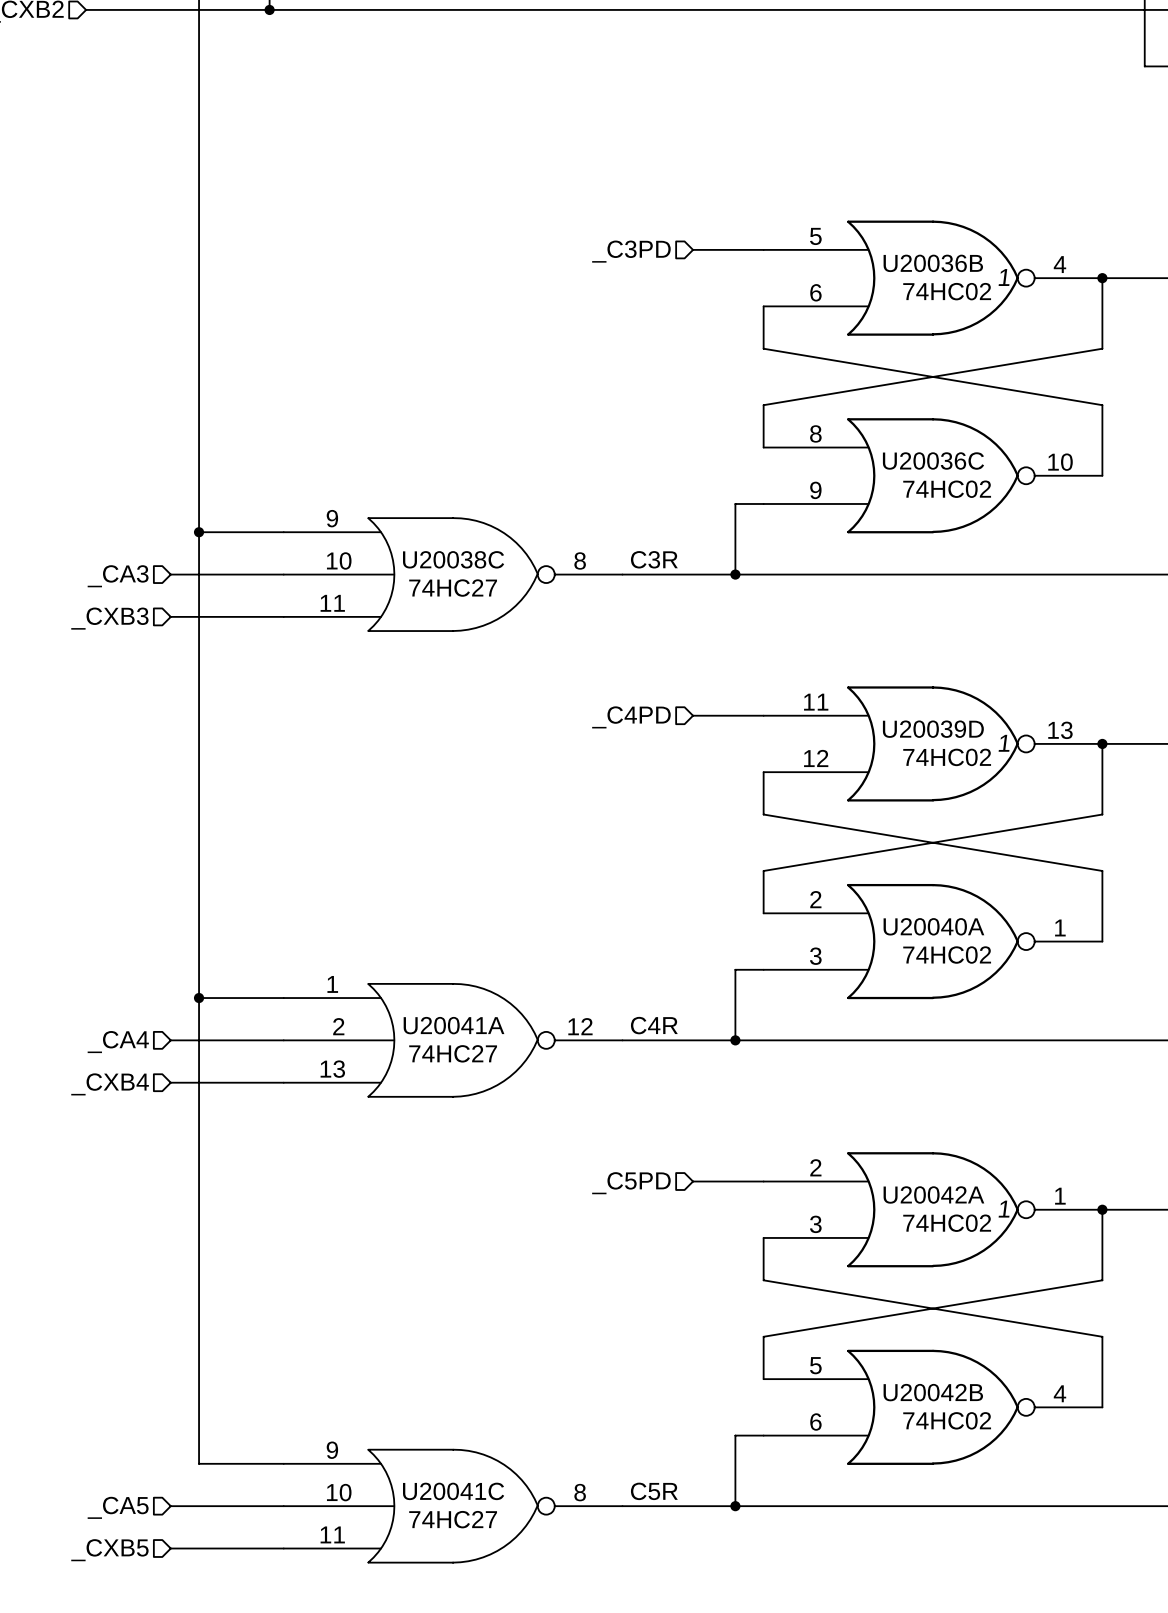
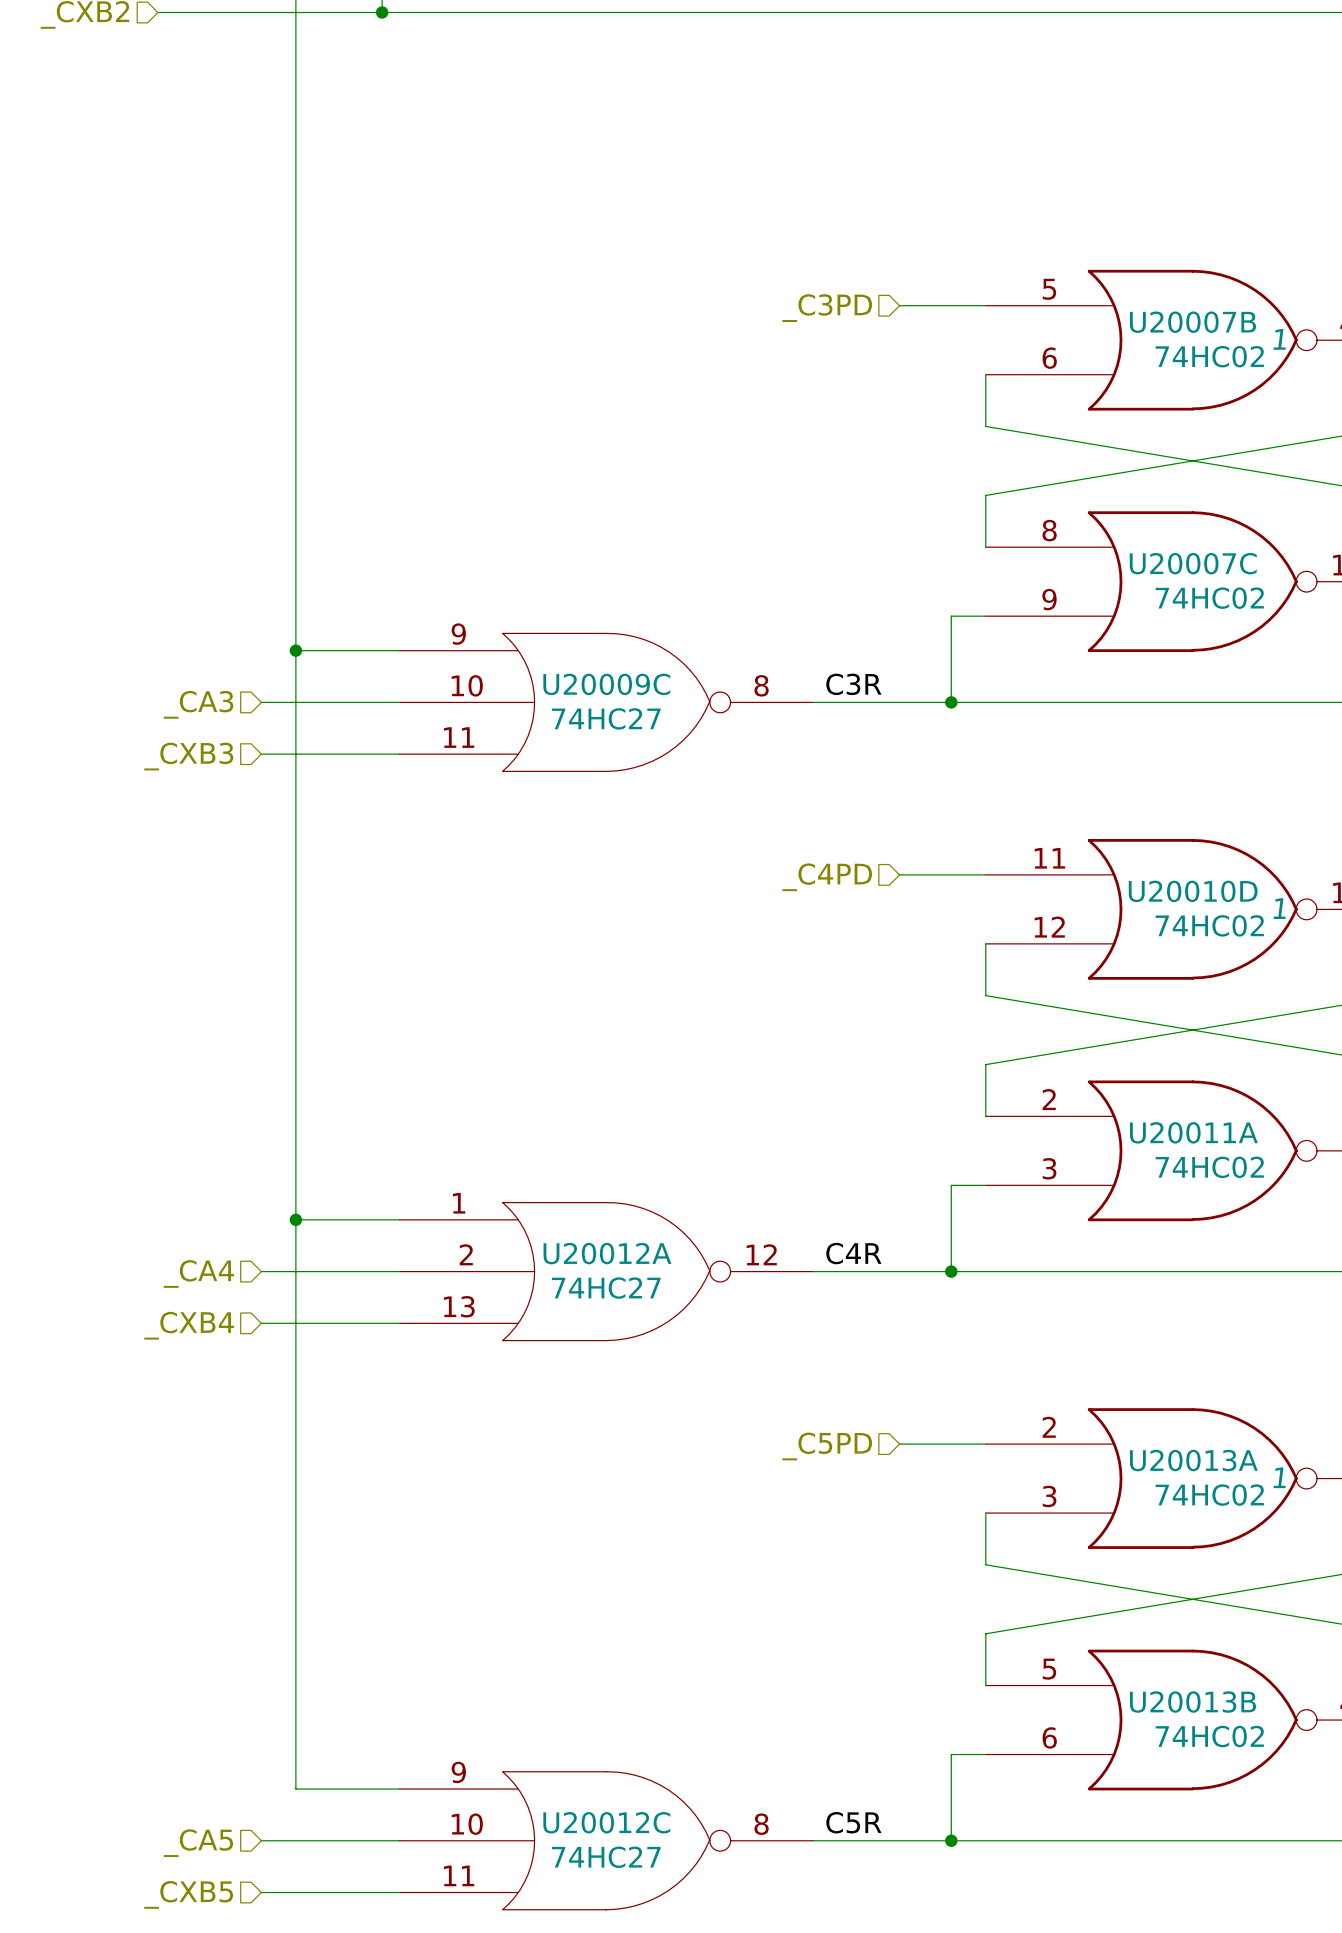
U20036B name: U20036B (933, 263) -> U20007B (1193, 322)
U20036C name: U20036C (933, 461) -> U20007C (1193, 563)
U20038C name: U20038C (453, 559) -> U20009C (606, 684)
U20039D name: U20039D (933, 729) -> U20010D (1193, 891)
U20040A name: U20040A (933, 926) -> U20011A (1193, 1132)
U20041A name: U20041A (454, 1025) -> U20012A (607, 1253)
U20042A name: U20042A (933, 1194) -> U20013A (1193, 1460)
U20042B name: U20042B (933, 1392) -> U20013B (1193, 1702)
U20041C name: U20041C (453, 1491) -> U20012C (606, 1822)

